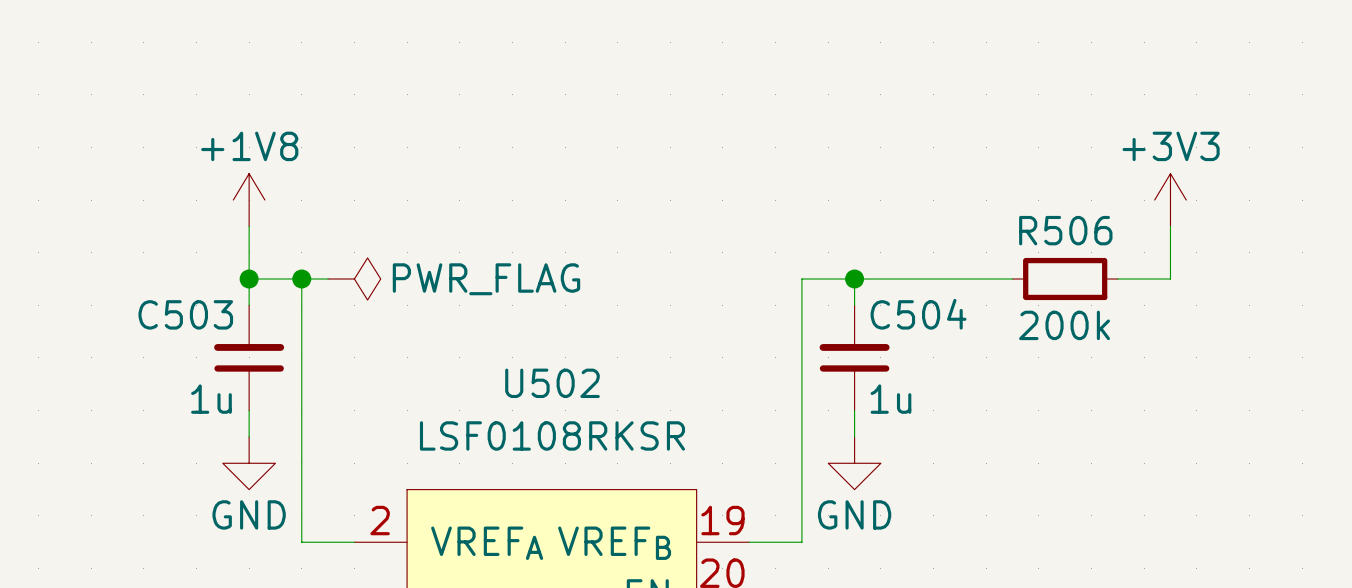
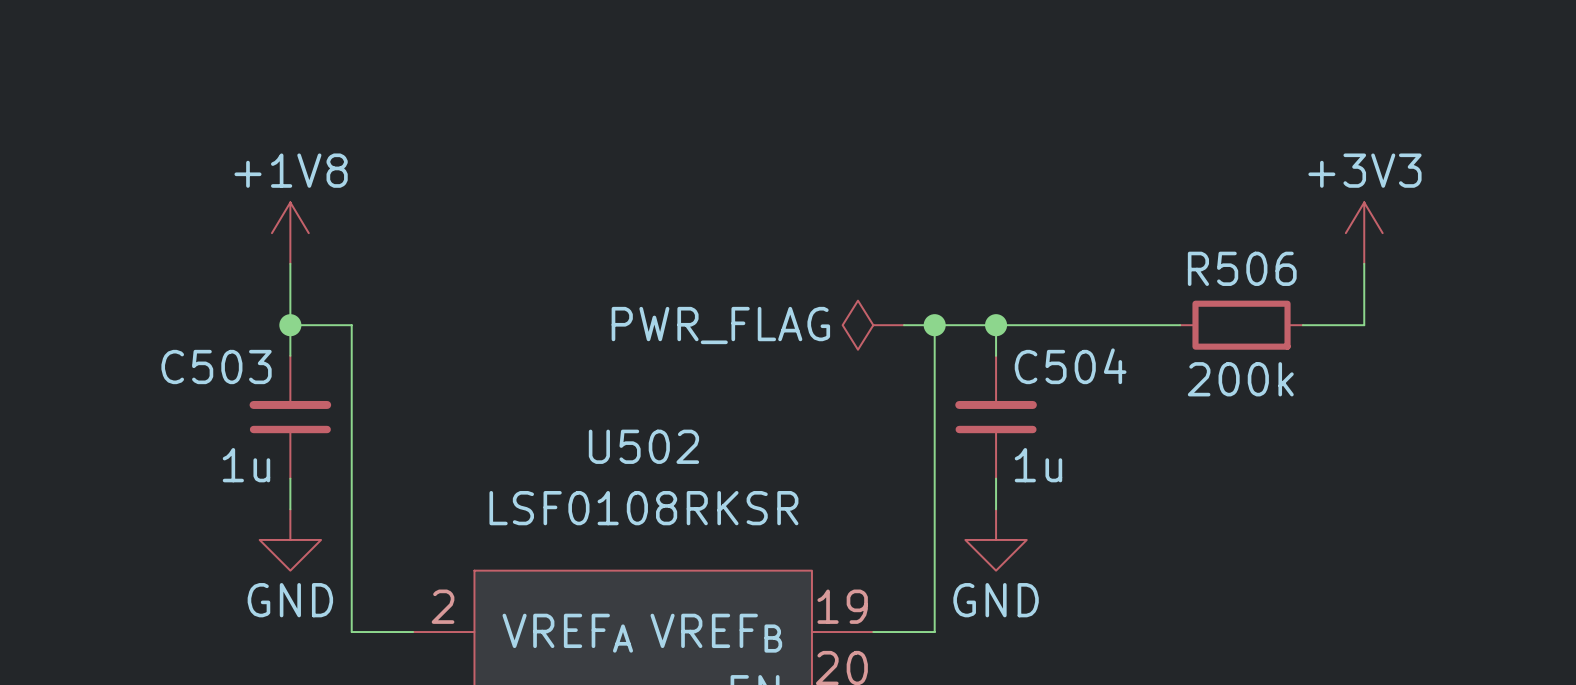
wire: (301, 279) (328, 279) -> (904, 325) (934, 325)
junction: (301, 279) -> none
power symbol rotation: 0° (354, 279) -> 180° (873, 325)
power symbol position: PWR_FLAG (354, 279) -> PWR_FLAG (873, 325)
junction: none -> (934, 325)

